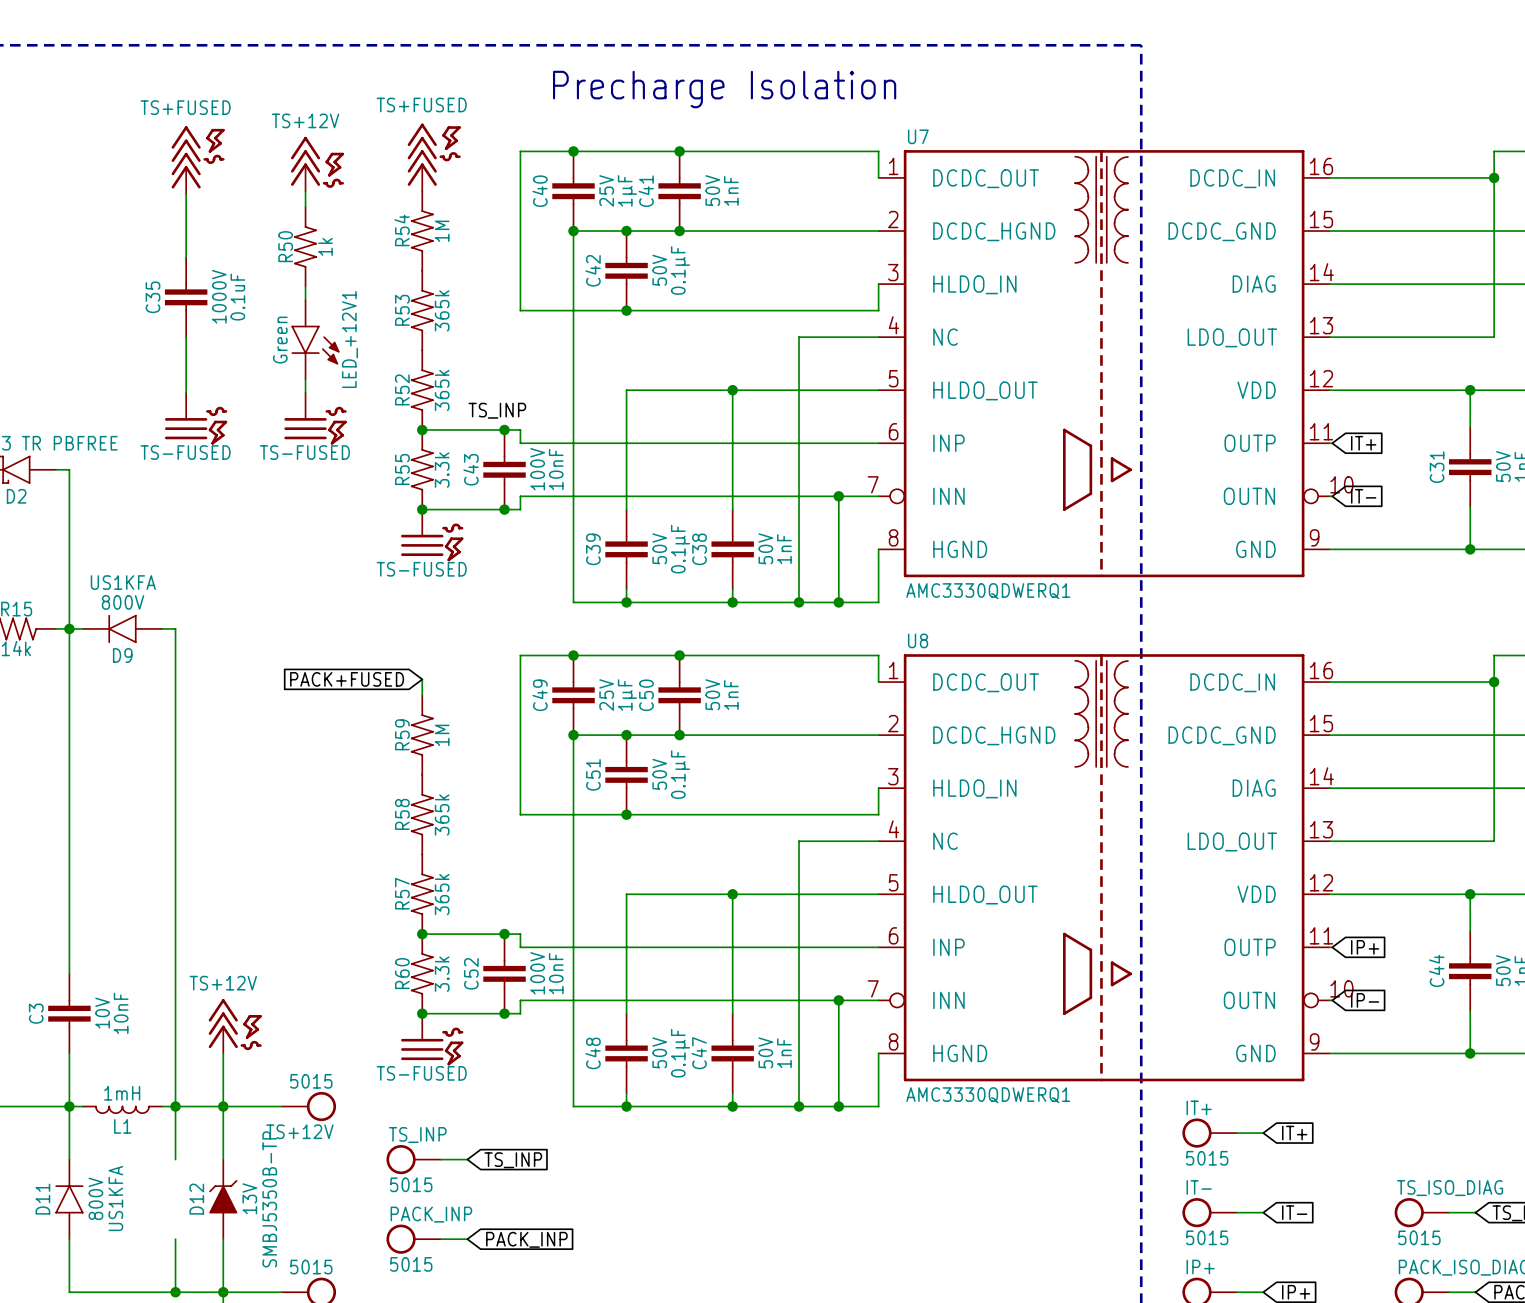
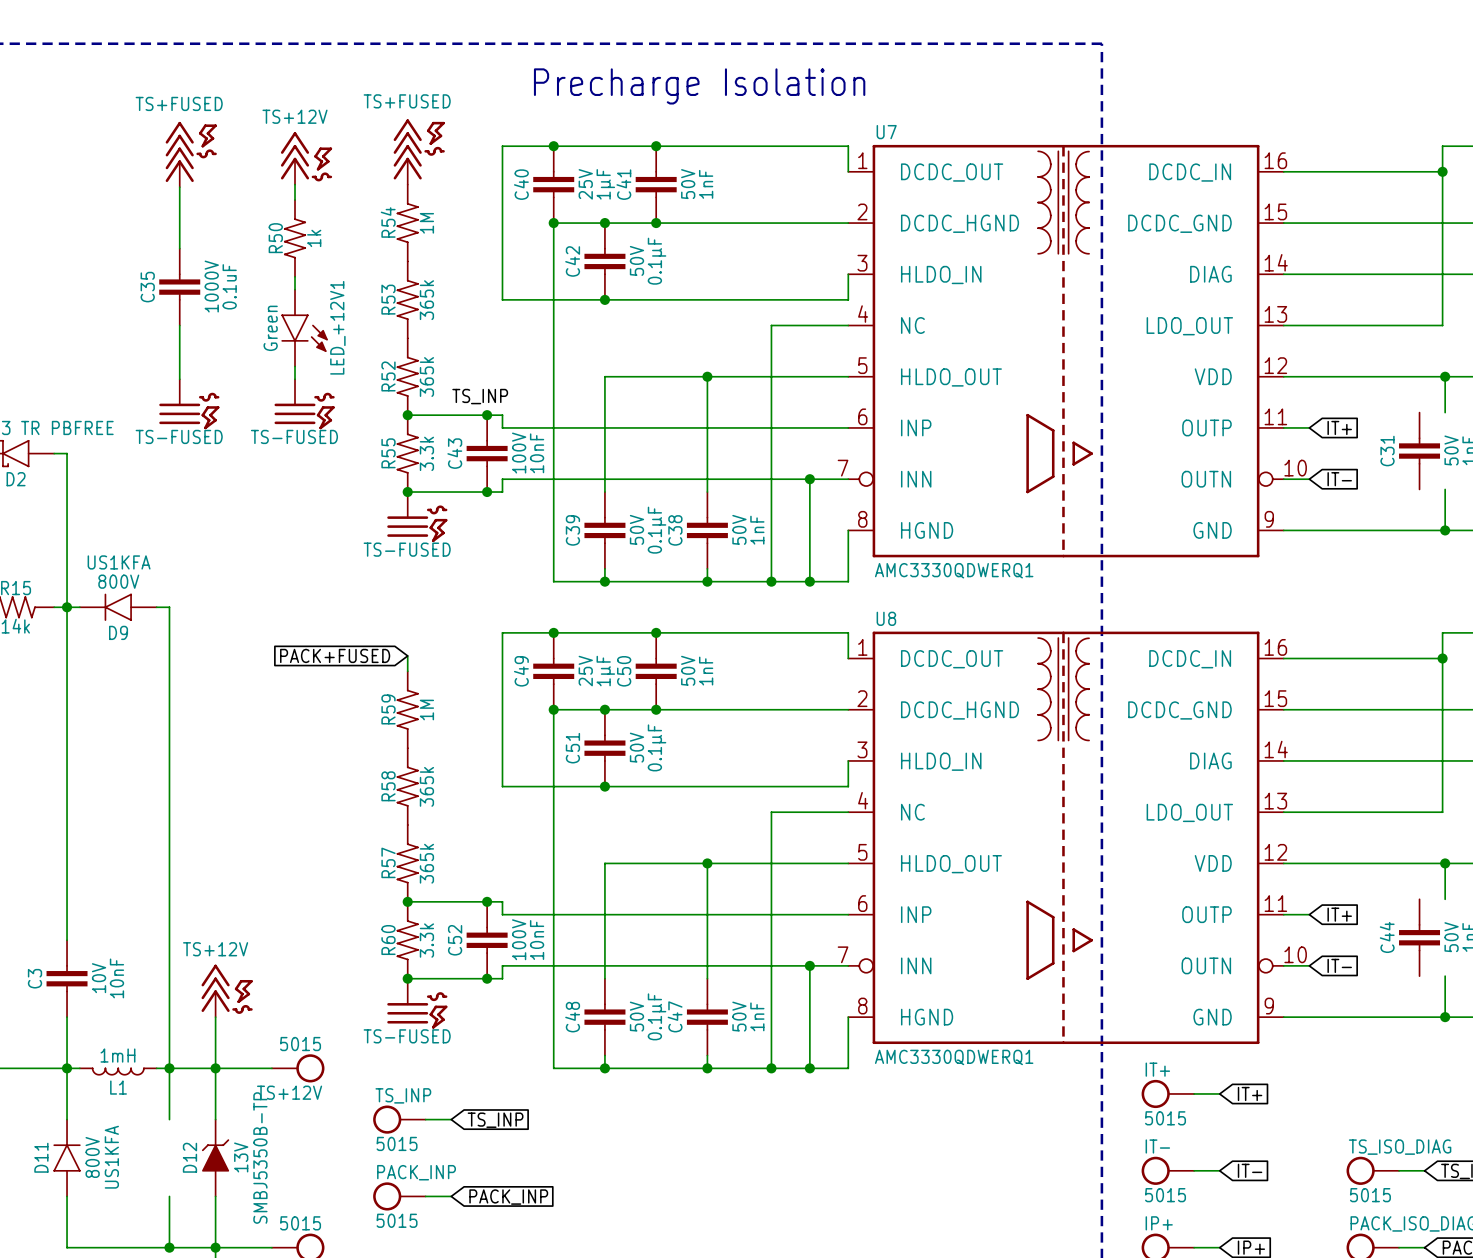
wire: (1470, 390) (1470, 427) -> (1445, 376) (1445, 412)
junction position: (1470, 390) -> (1445, 376)
wire: none -> (1286, 427) (1309, 427)
global label position: IT+ (1363, 443) -> IT+ (1339, 427)
wire: none -> (1286, 479) (1309, 479)
global label position: IT- (1363, 496) -> IT- (1339, 479)
wire: (1470, 506) (1470, 549) -> (1445, 489) (1445, 530)
junction position: (1470, 549) -> (1445, 530)
wire: (1470, 894) (1470, 931) -> (1445, 863) (1445, 899)
junction position: (1470, 894) -> (1445, 863)
wire: none -> (1286, 914) (1309, 914)
global label: IP+ (1365, 947) -> IT+ (1339, 914)
wire: none -> (1286, 965) (1309, 965)
global label: IP- (1365, 1000) -> IT- (1339, 965)
wire: (1470, 1011) (1470, 1053) -> (1445, 976) (1445, 1017)
junction position: (1470, 1053) -> (1445, 1017)

